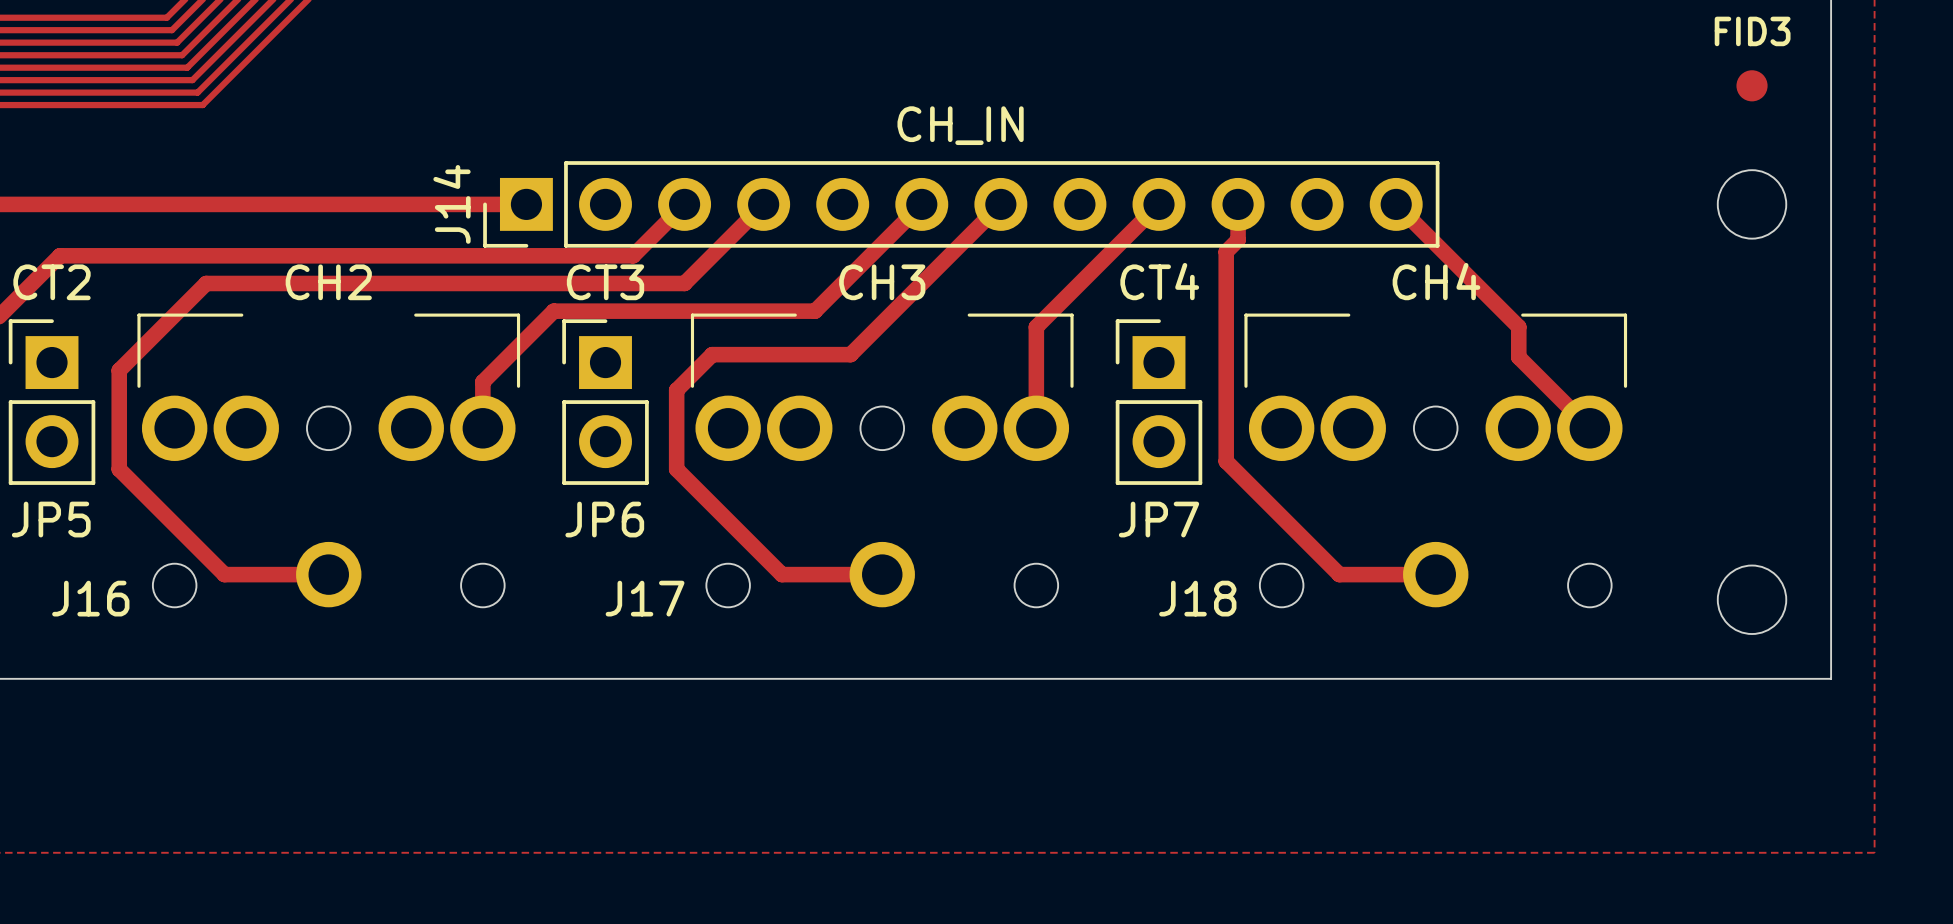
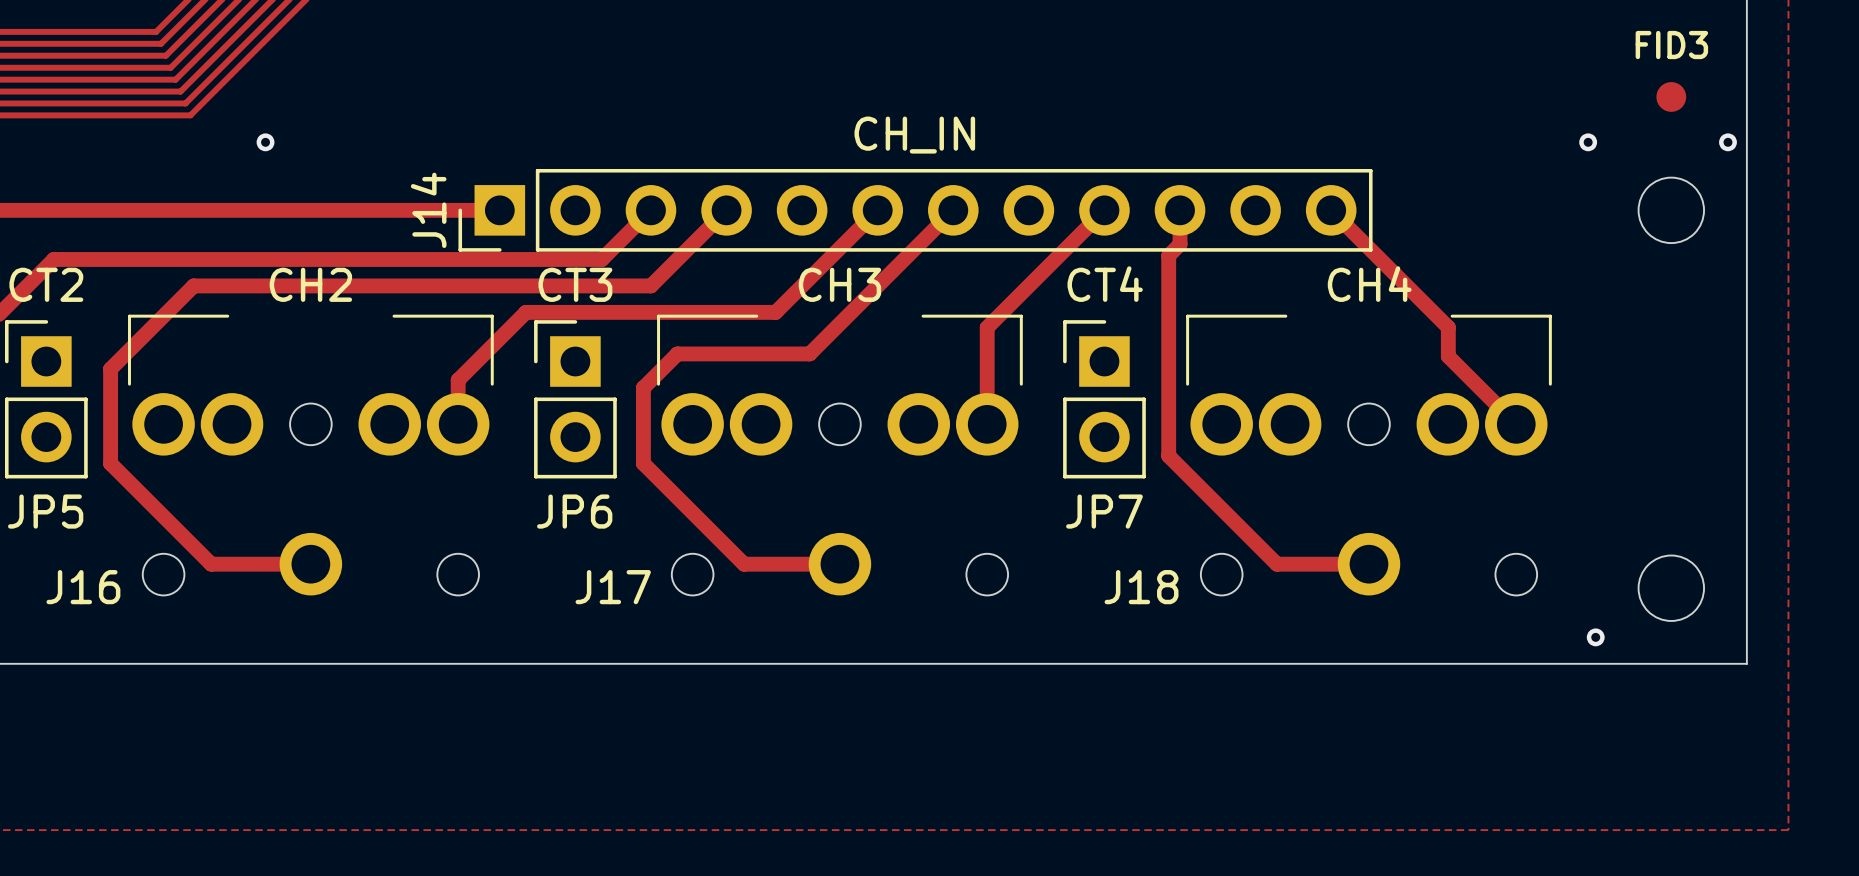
via: none -> (265, 142)
via: none -> (1588, 142)
via: none -> (1727, 142)
via: none -> (1595, 637)

